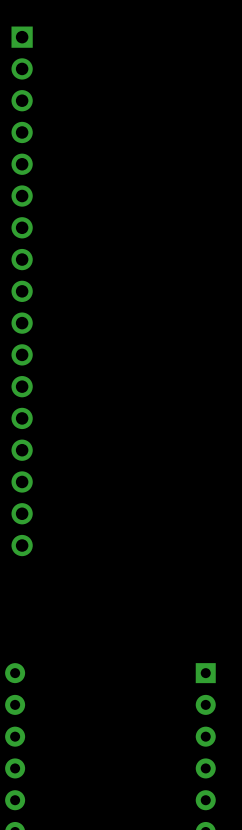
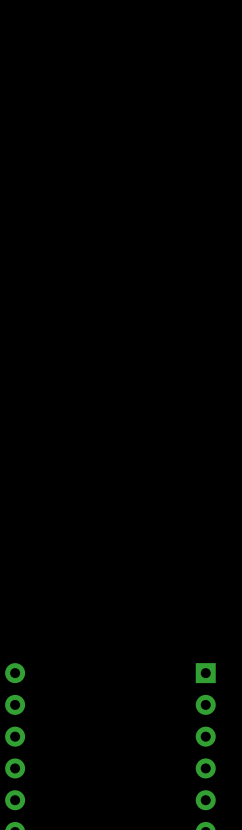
part: (22, 291) -> none

